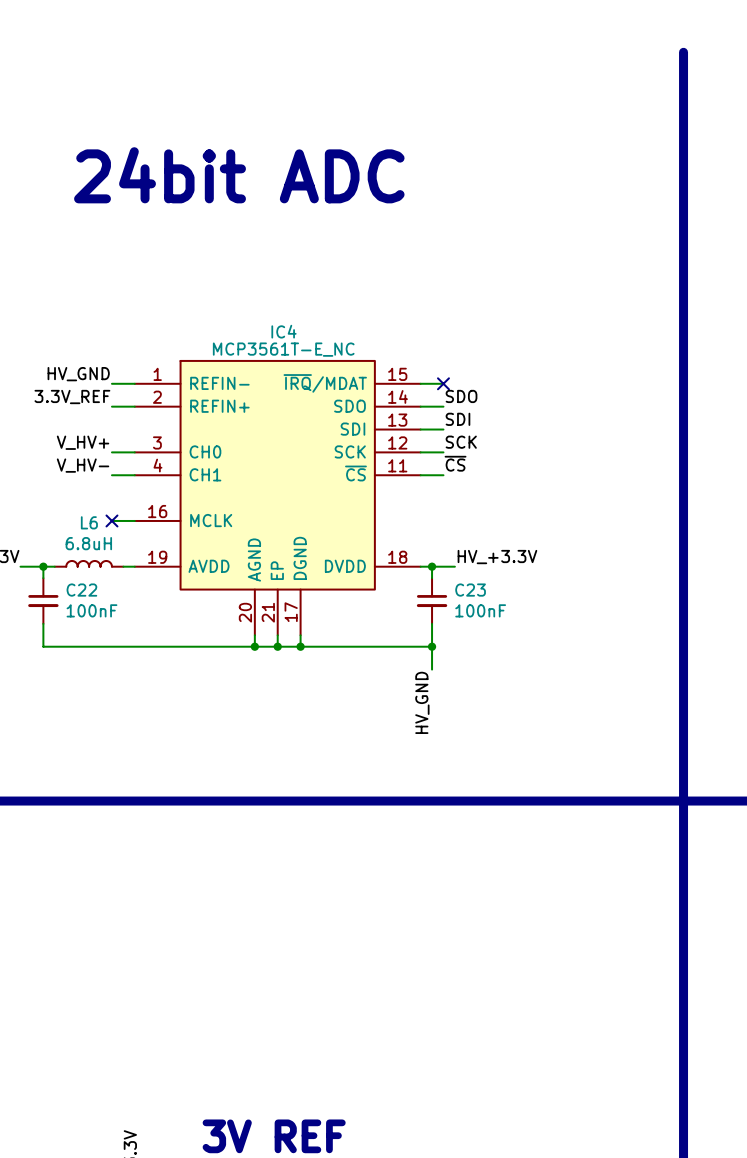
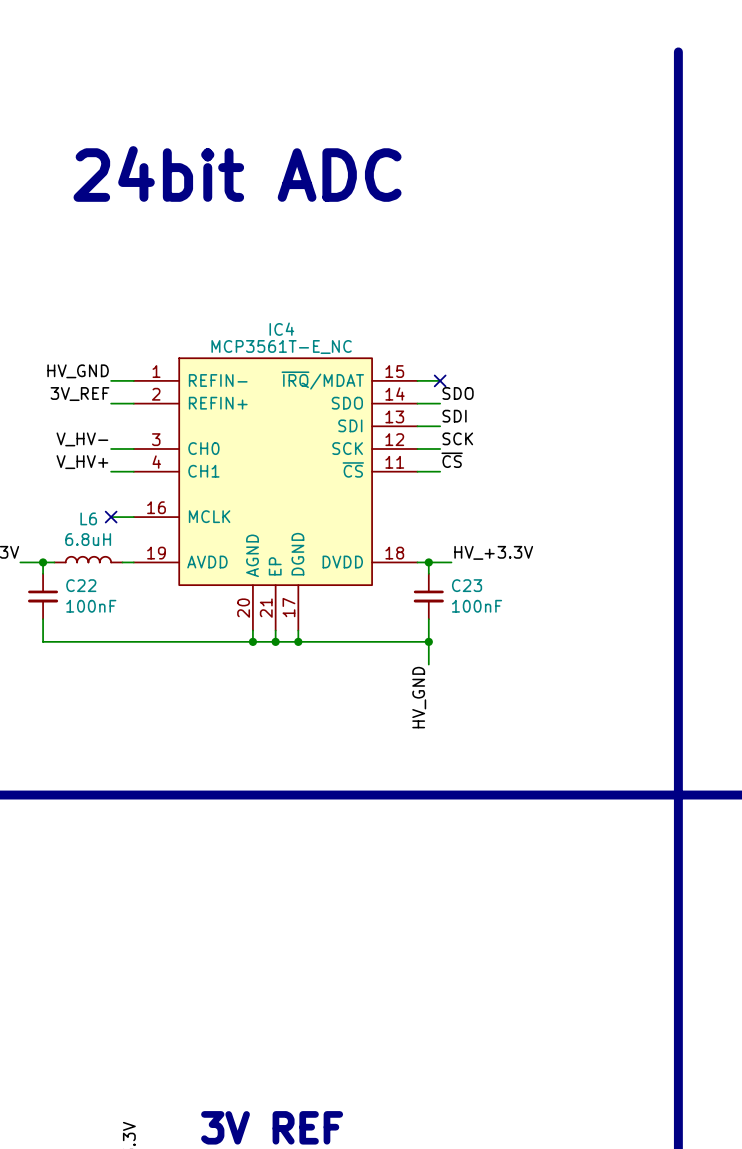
label: 3.3V_REF (72, 397) -> 3V_REF (79, 394)
label: V_HV+ (83, 442) -> V_HV- (82, 439)
label: V_HV- (83, 465) -> V_HV+ (82, 462)

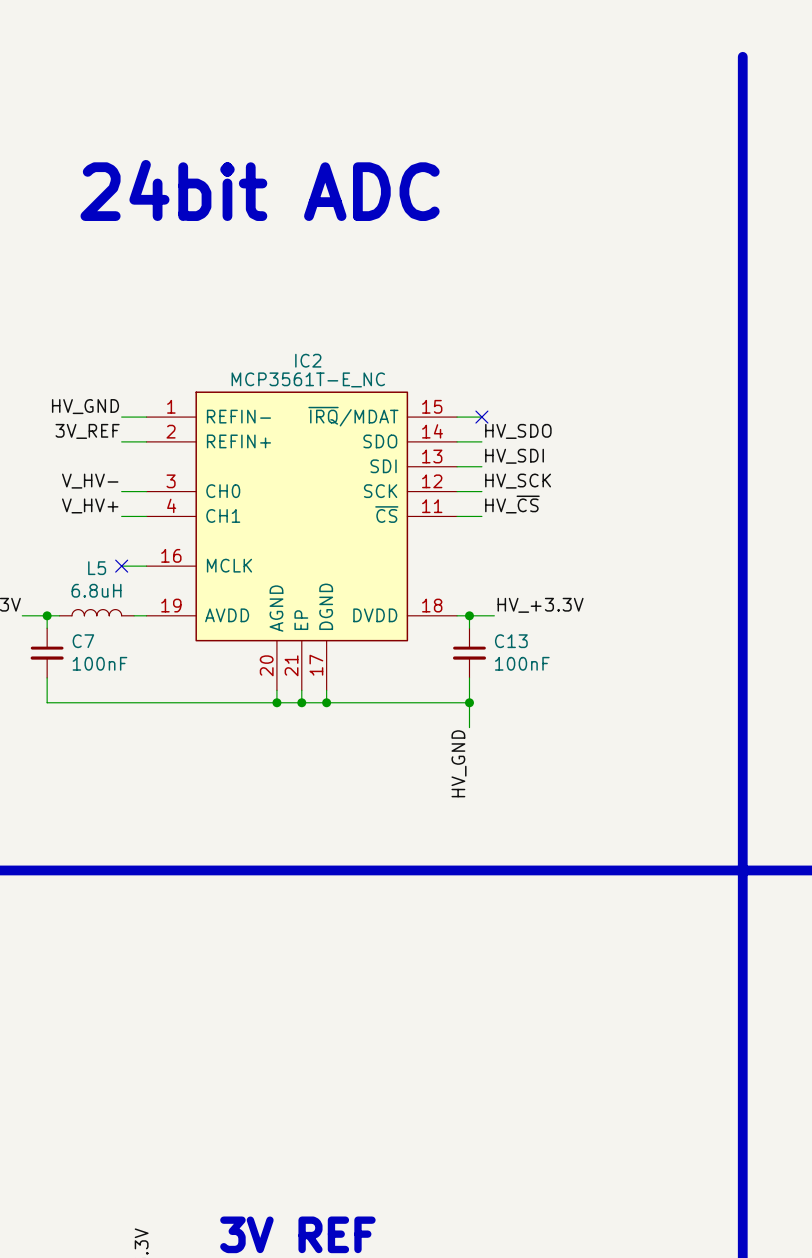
IC4 name: IC4 (281, 329) -> IC2 (308, 360)
label: SDO (458, 393) -> HV_SDO (518, 431)
label: SDI (454, 416) -> HV_SDI (514, 456)
label: SCK (457, 438) -> HV_SCK (518, 481)
label: ~{CS} (452, 460) -> HV_~{CS} (512, 504)
L6 name: L6 (88, 518) -> L5 (97, 568)
C22 name: C22 (81, 585) -> C7 (83, 641)
C23 name: C23 (467, 585) -> C13 (511, 641)

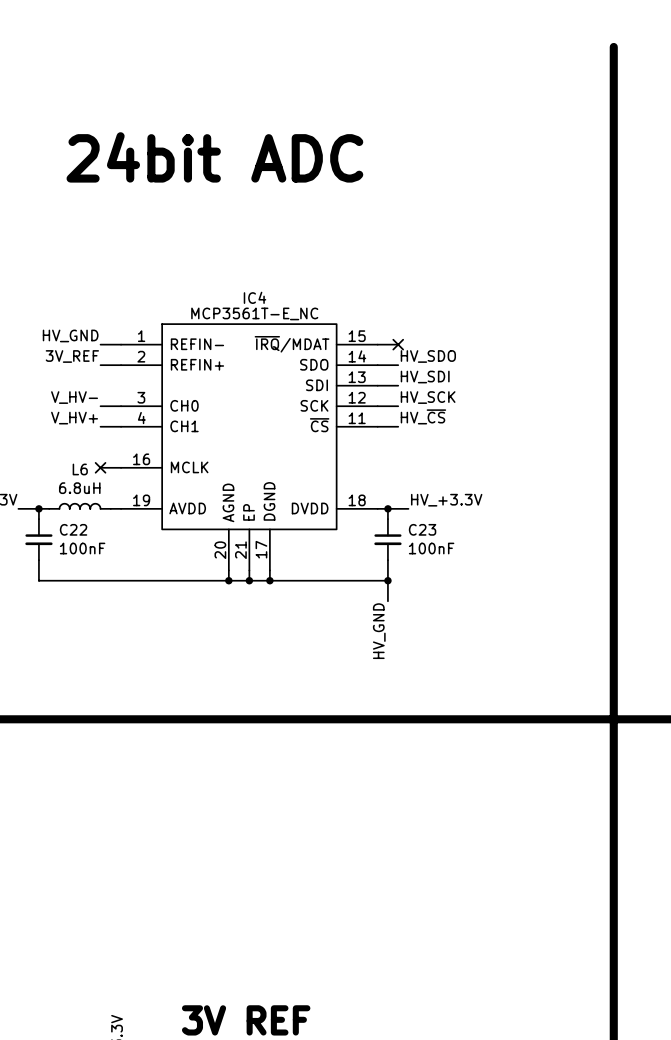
IC2 name: IC2 (308, 360) -> IC4 (255, 297)
L5 name: L5 (97, 568) -> L6 (80, 469)
C7 name: C7 (83, 641) -> C22 (73, 529)
C13 name: C13 (511, 641) -> C23 (422, 529)

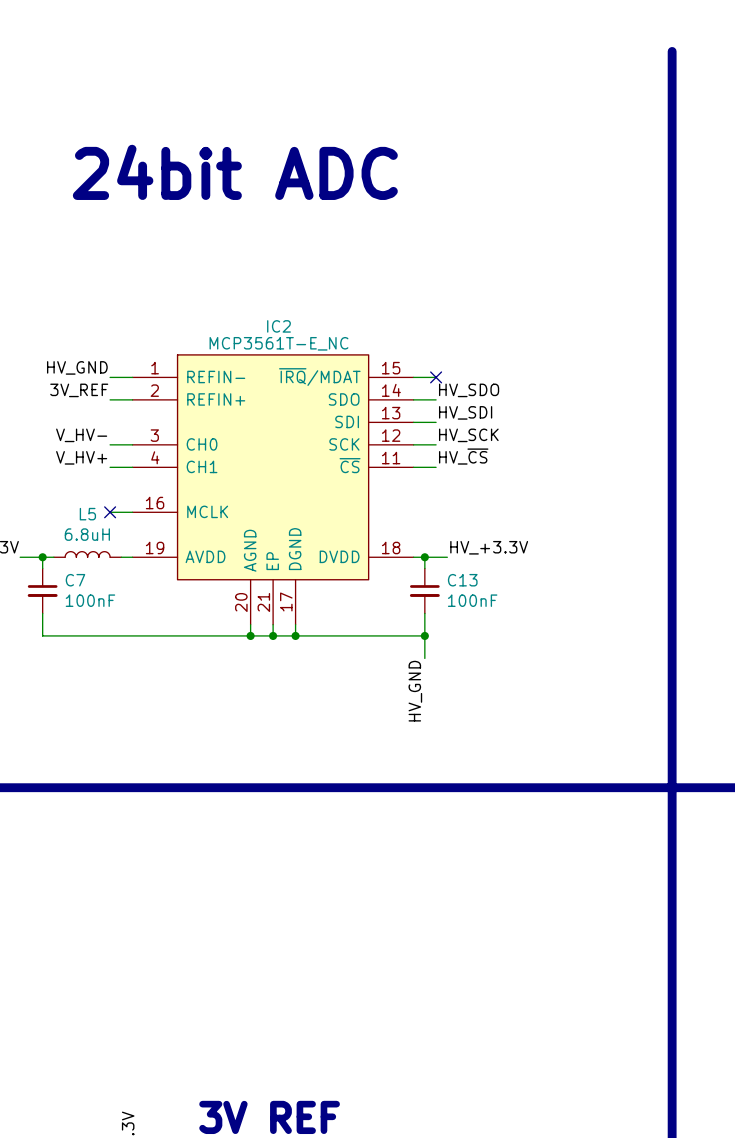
IC4 name: IC4 (255, 297) -> IC2 (278, 326)
L6: 6.8uH (80, 506) -> none
L5: none -> 6.8uH (87, 554)
C22 name: C22 (73, 529) -> C7 (75, 580)
C23 name: C23 (422, 529) -> C13 (462, 580)

